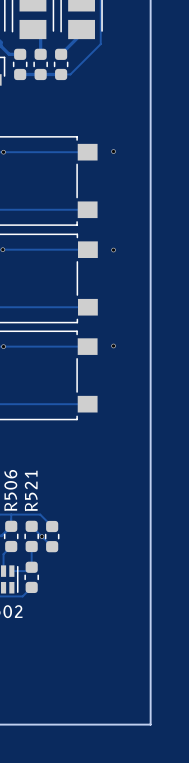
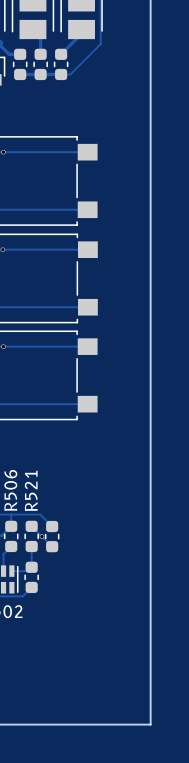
via: (113, 151) -> none
via: (113, 250) -> none
via: (113, 345) -> none

